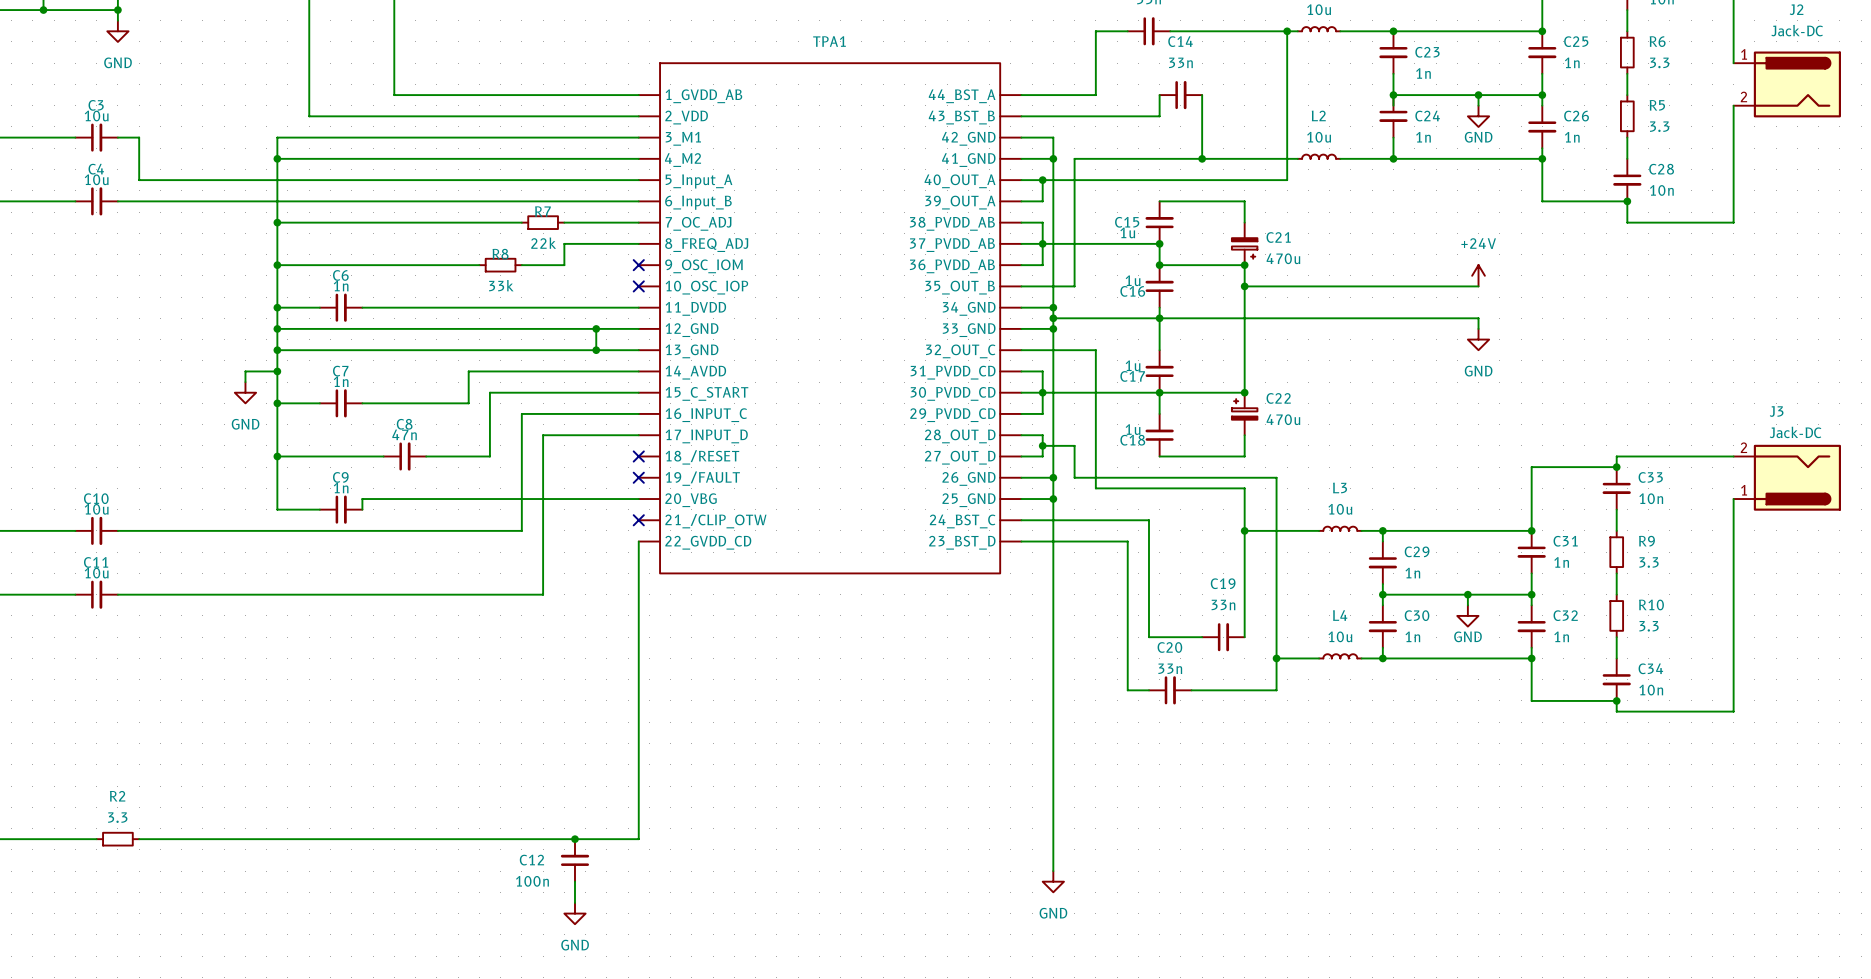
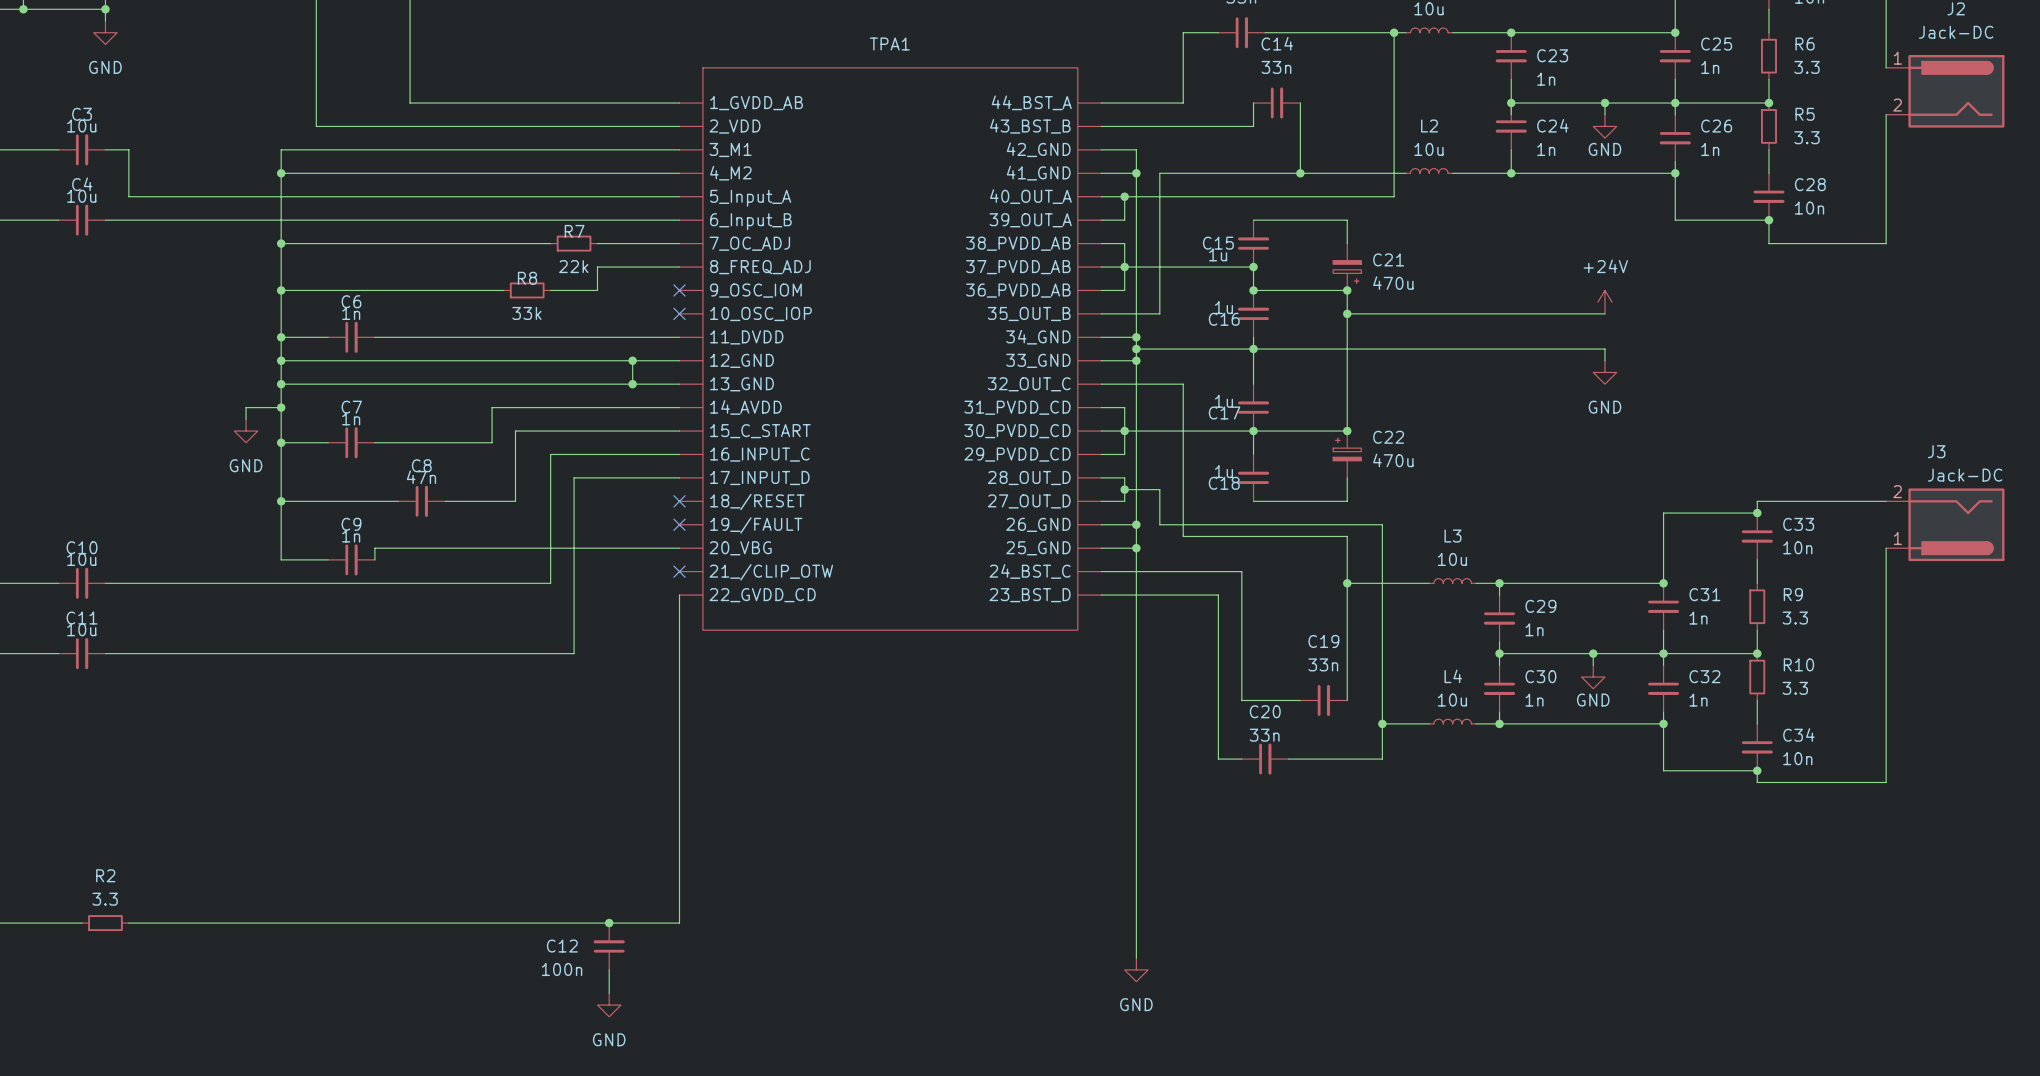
wire: none -> (1675, 103) (1768, 103)
junction: none -> (1768, 103)
wire: none -> (1663, 653) (1757, 653)
junction: none -> (1757, 653)

